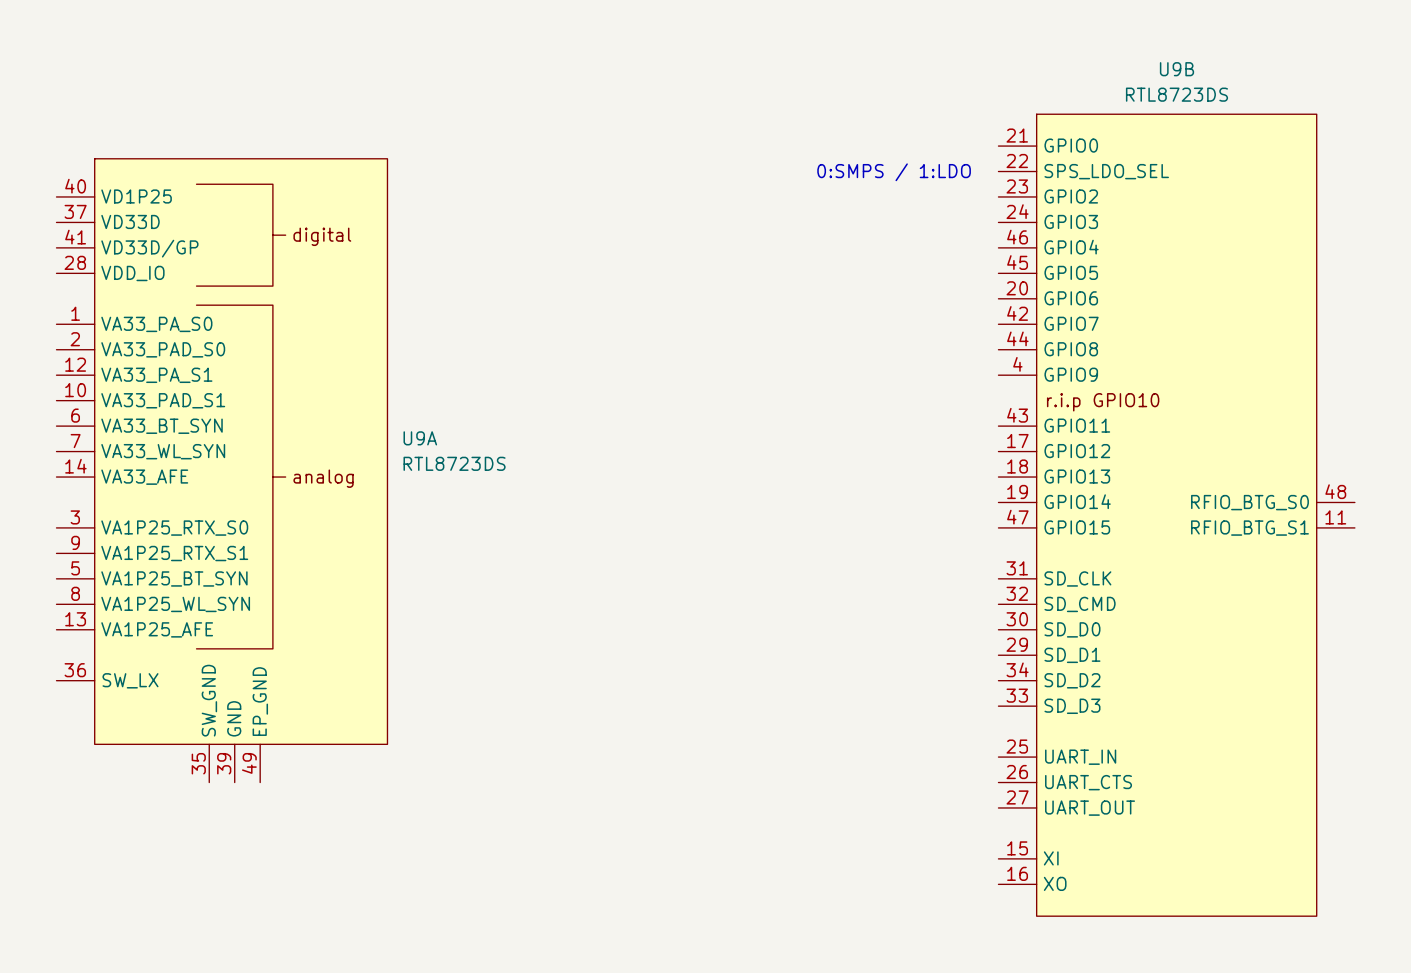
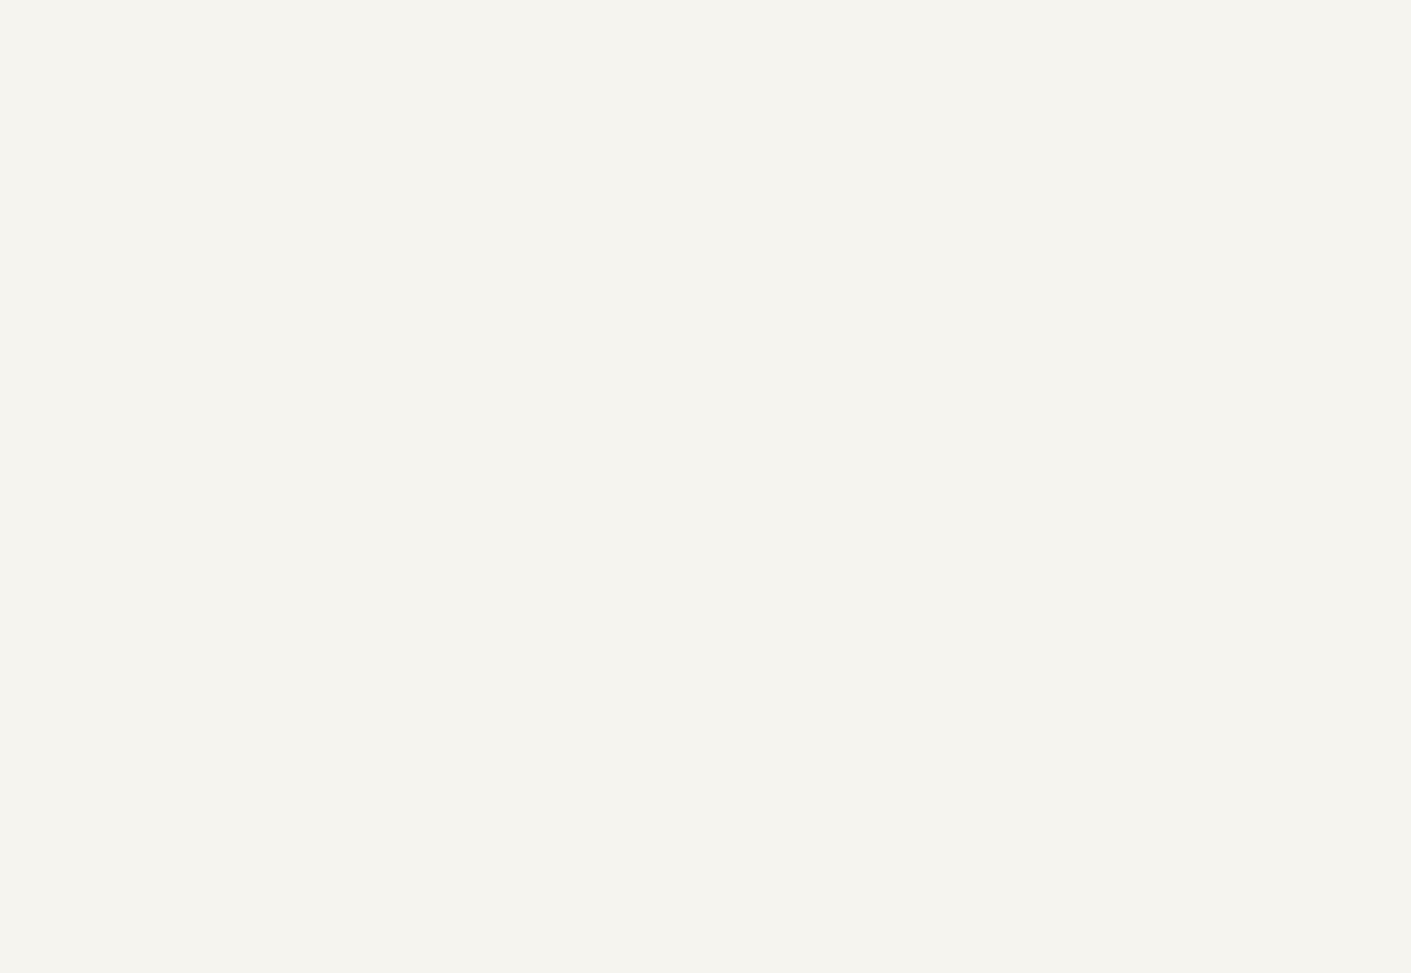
text: 0:SMPS / 1:LDO (894, 172) -> none
U9A: RTL8723DS (221, 470) -> none
U9B: RTL8723DS (1176, 515) -> none

